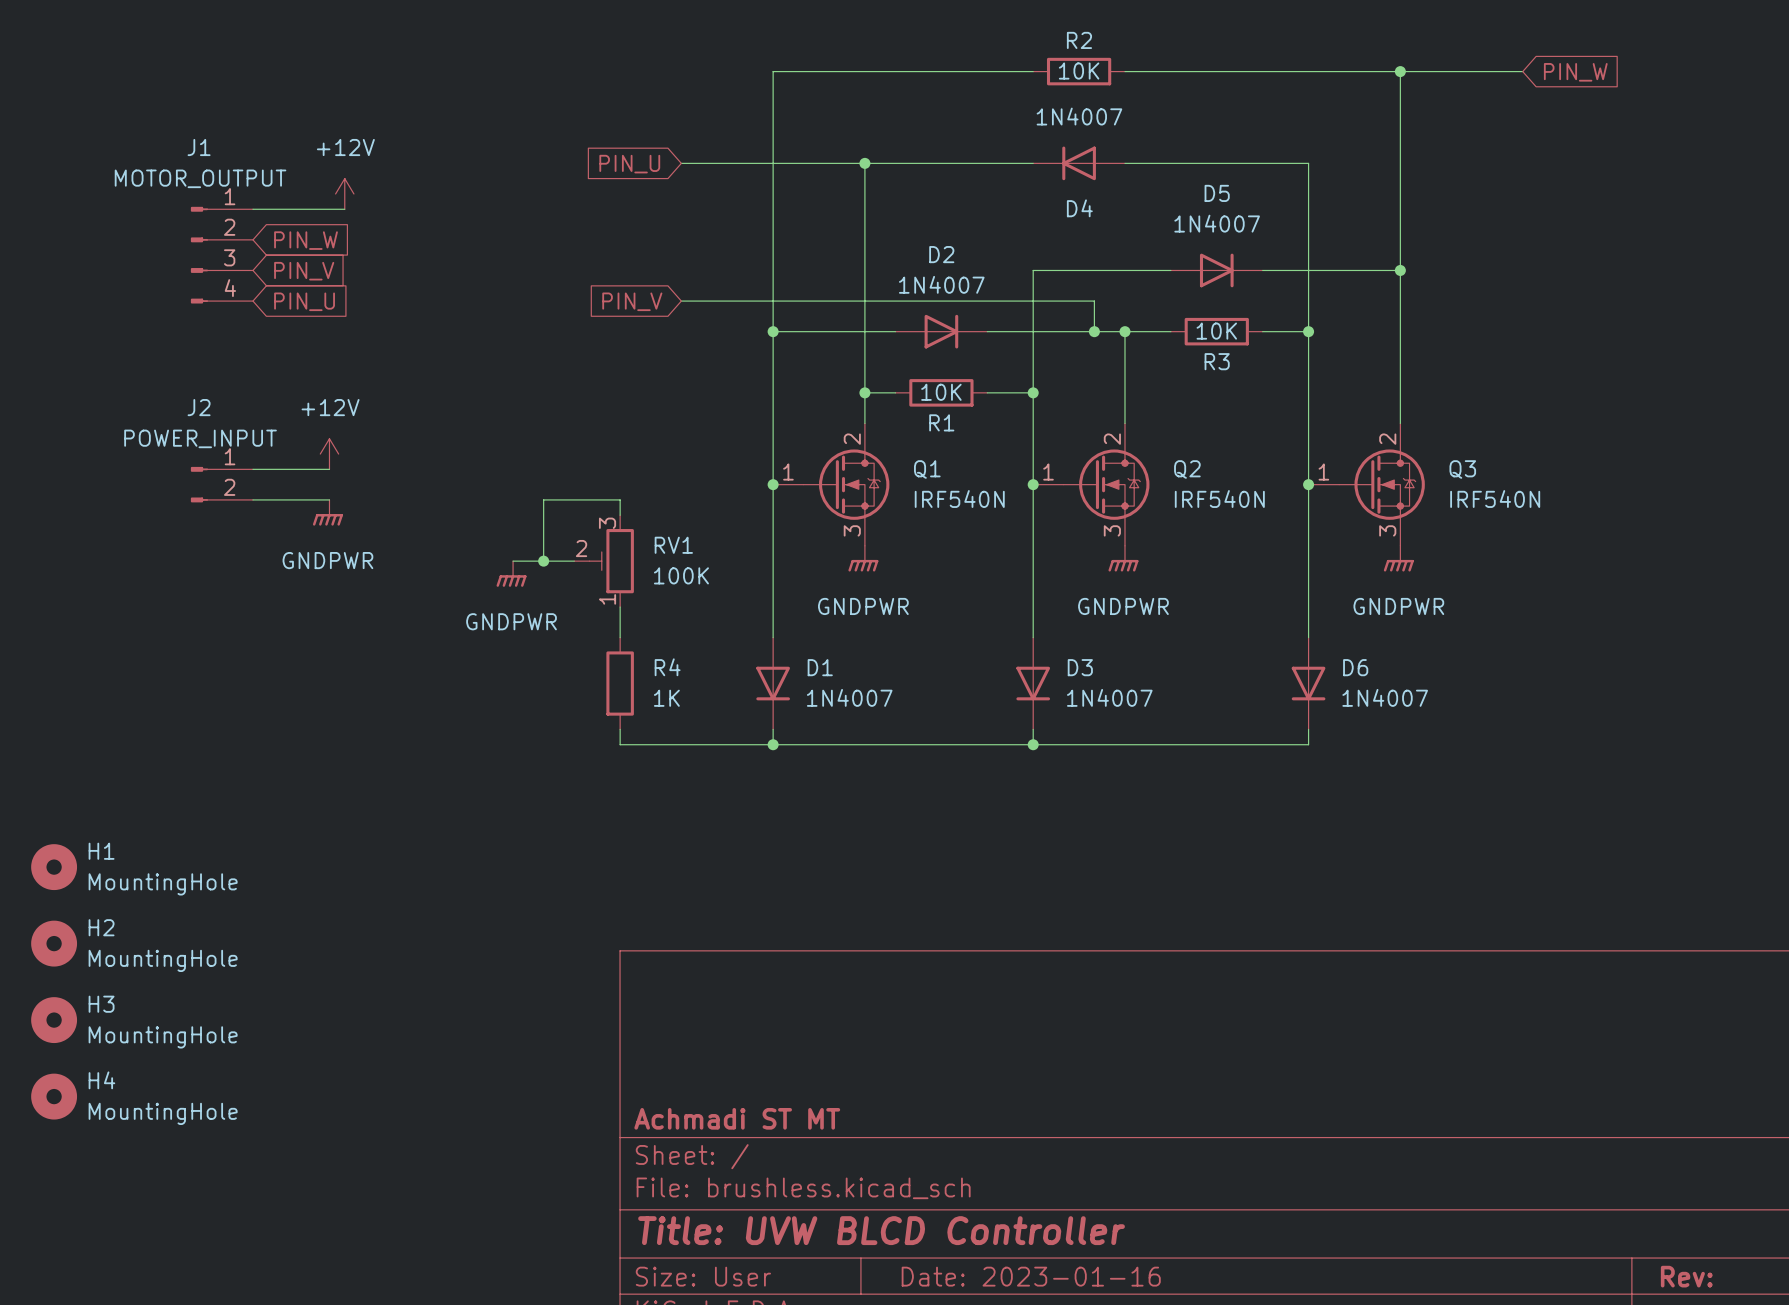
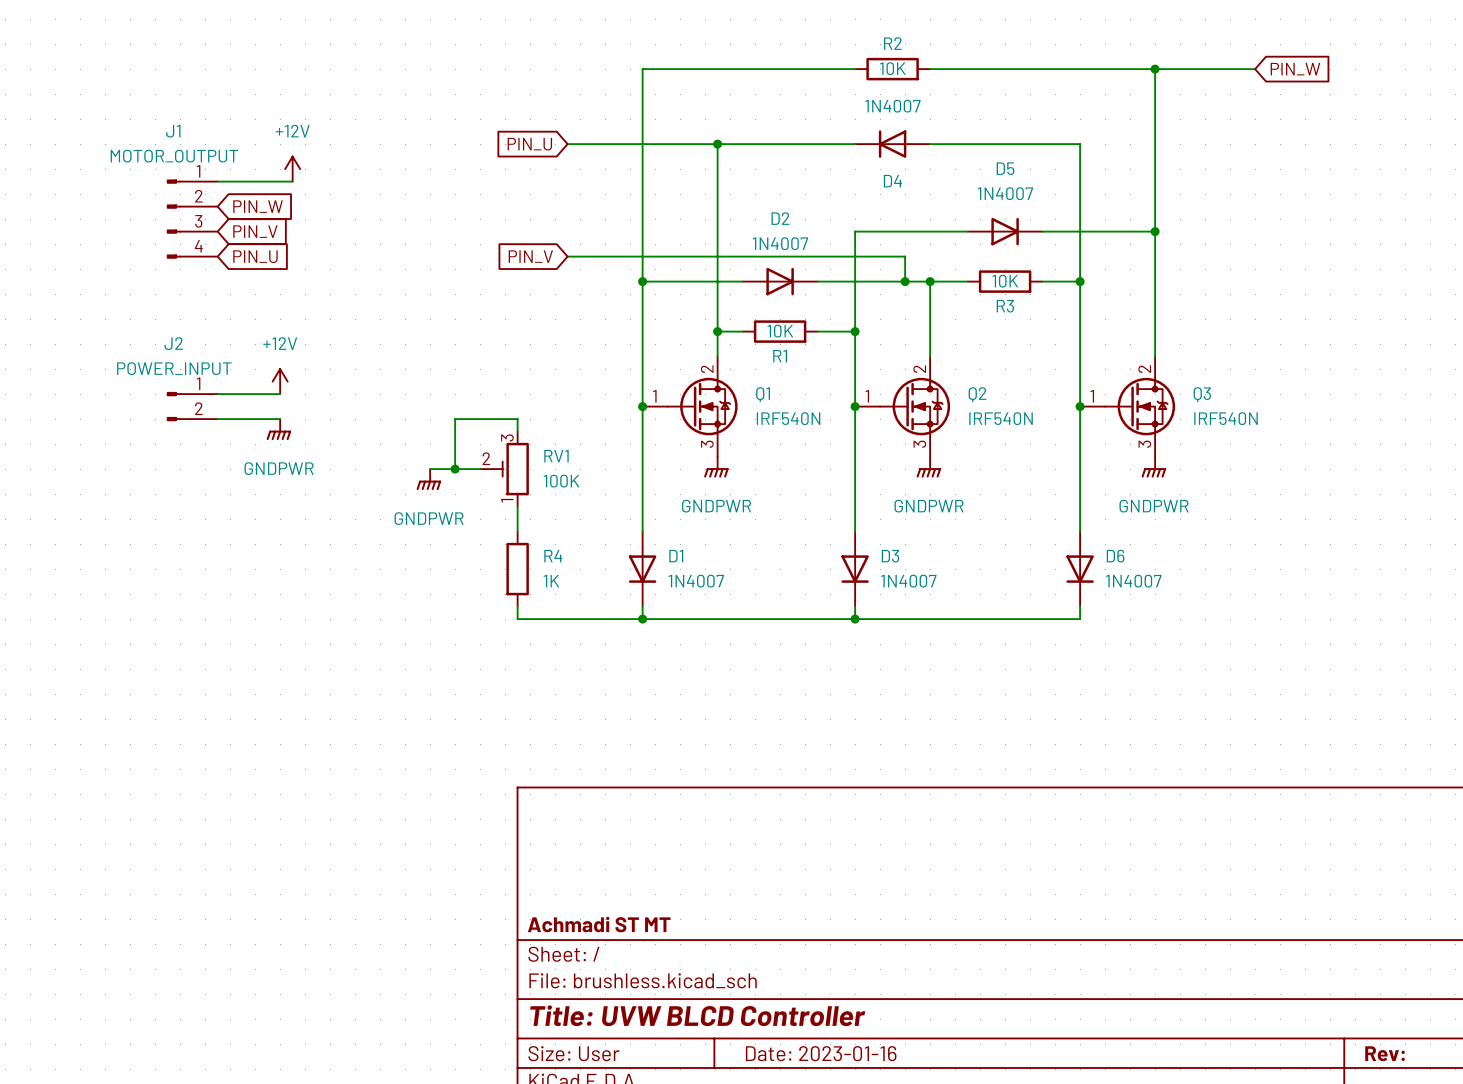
H1: MountingHole (54, 867) -> none
H2: MountingHole (54, 943) -> none
H3: MountingHole (54, 1020) -> none
H4: MountingHole (54, 1096) -> none

